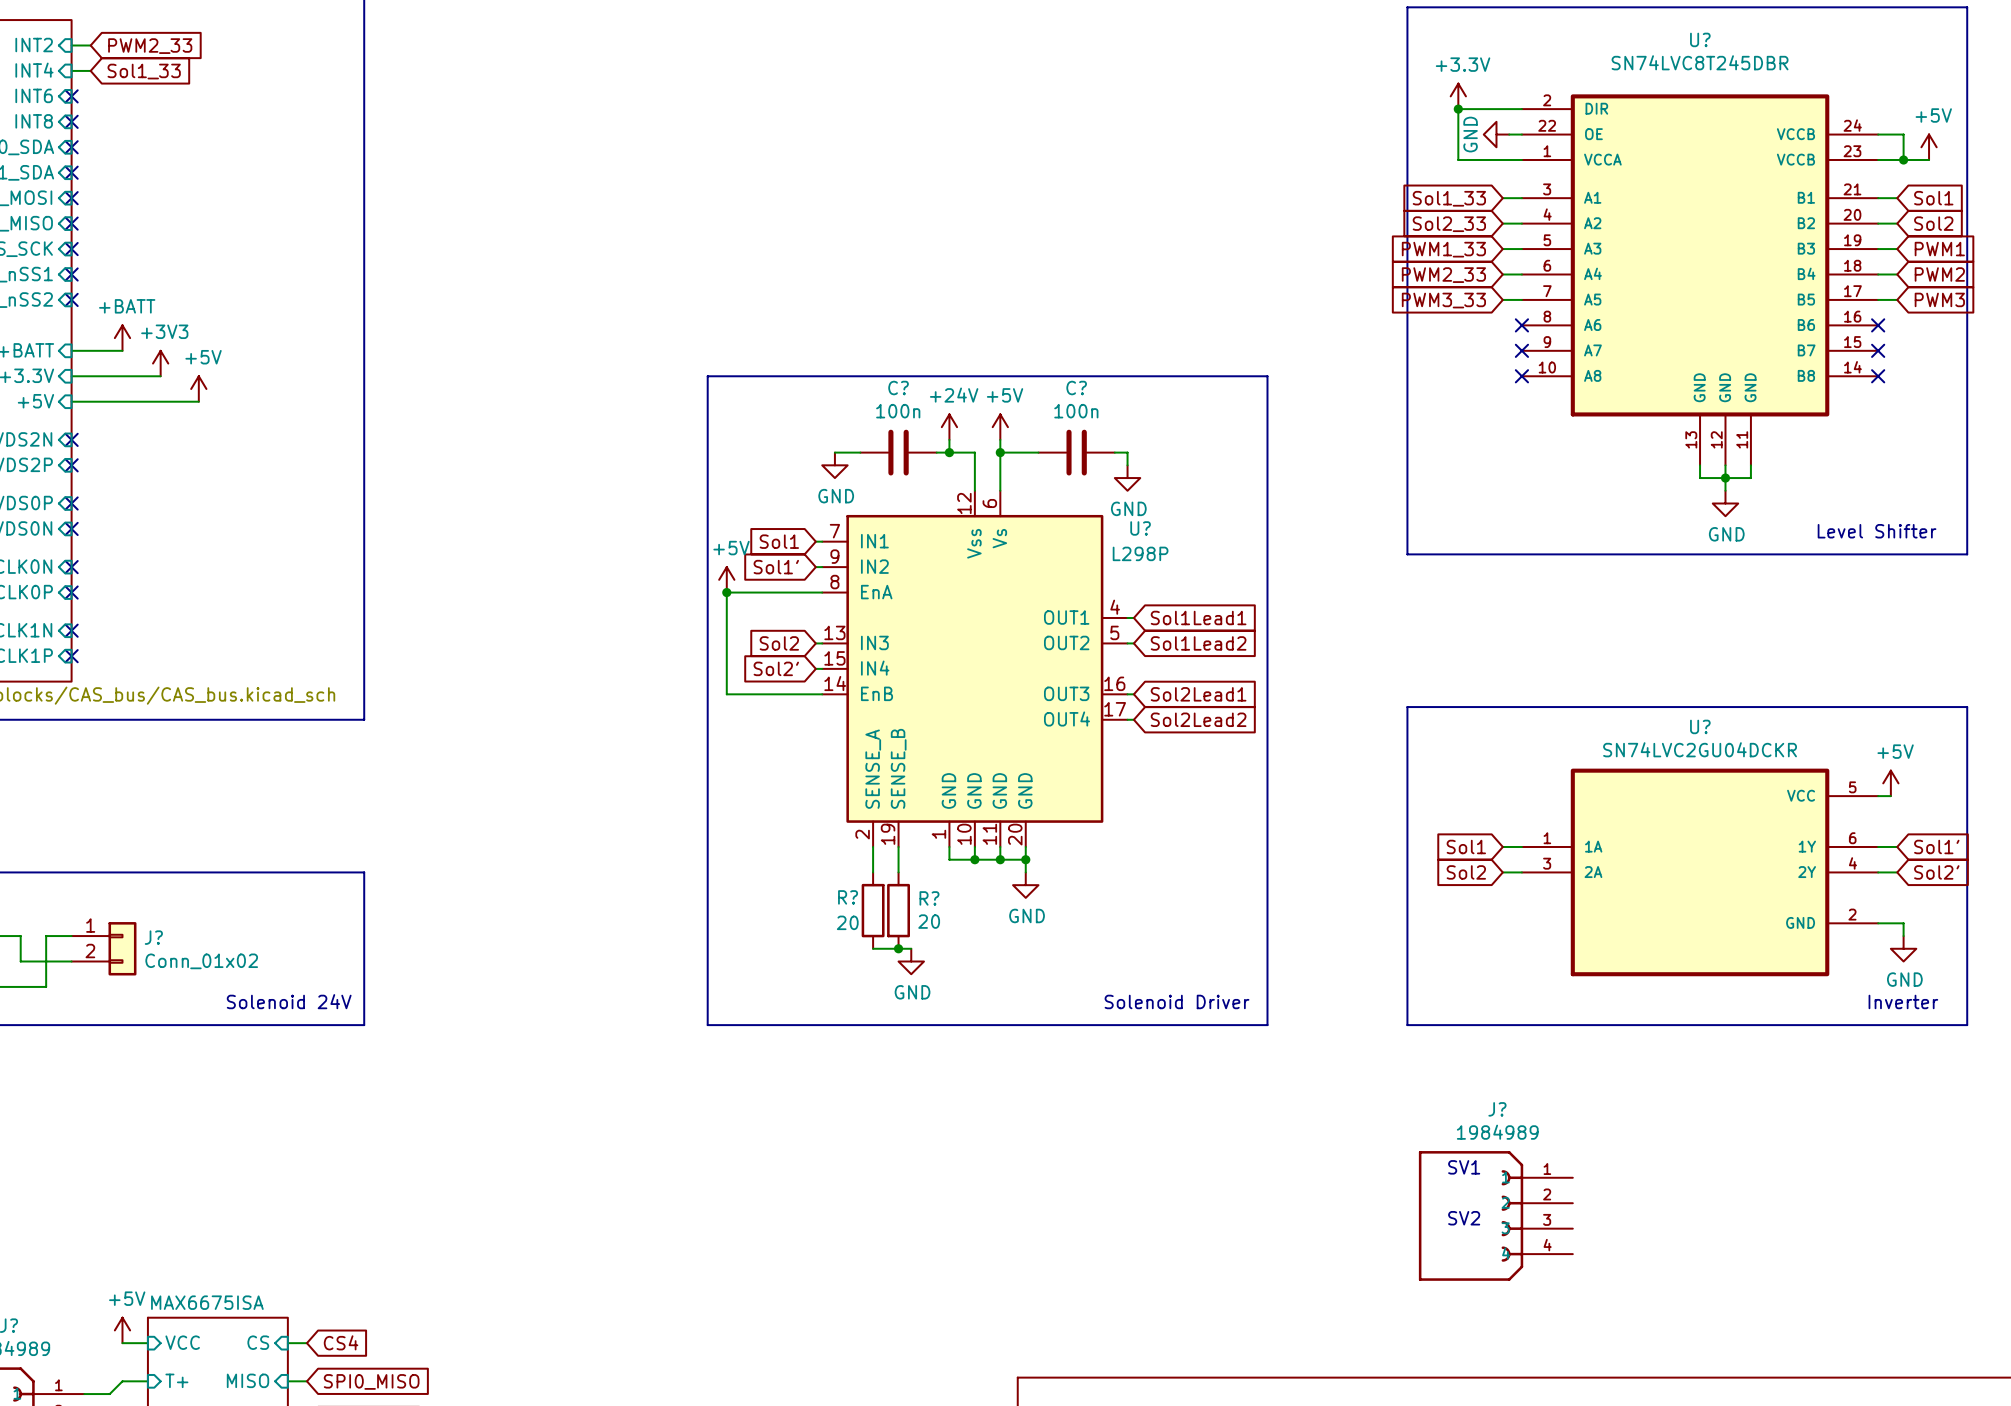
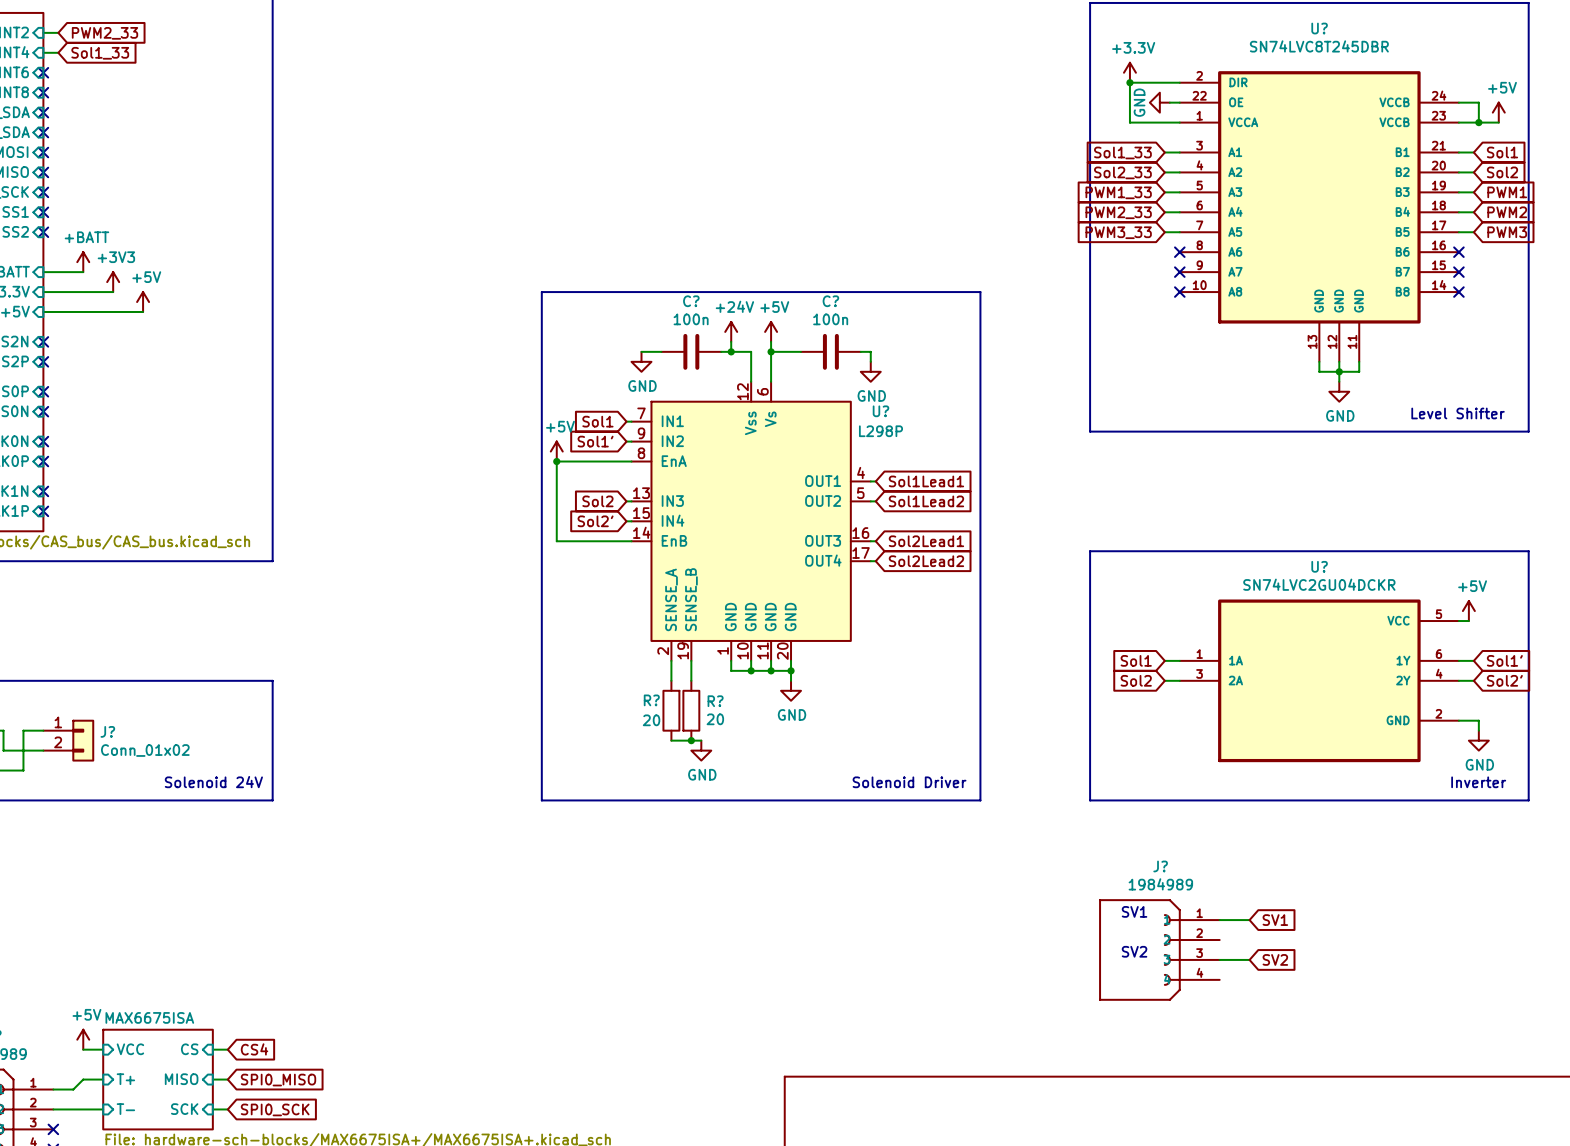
wire: none -> (1219, 920) (1249, 920)
global label: none -> SV1 (1275, 920)
wire: none -> (1219, 959) (1249, 959)
global label: none -> SV2 (1275, 959)

